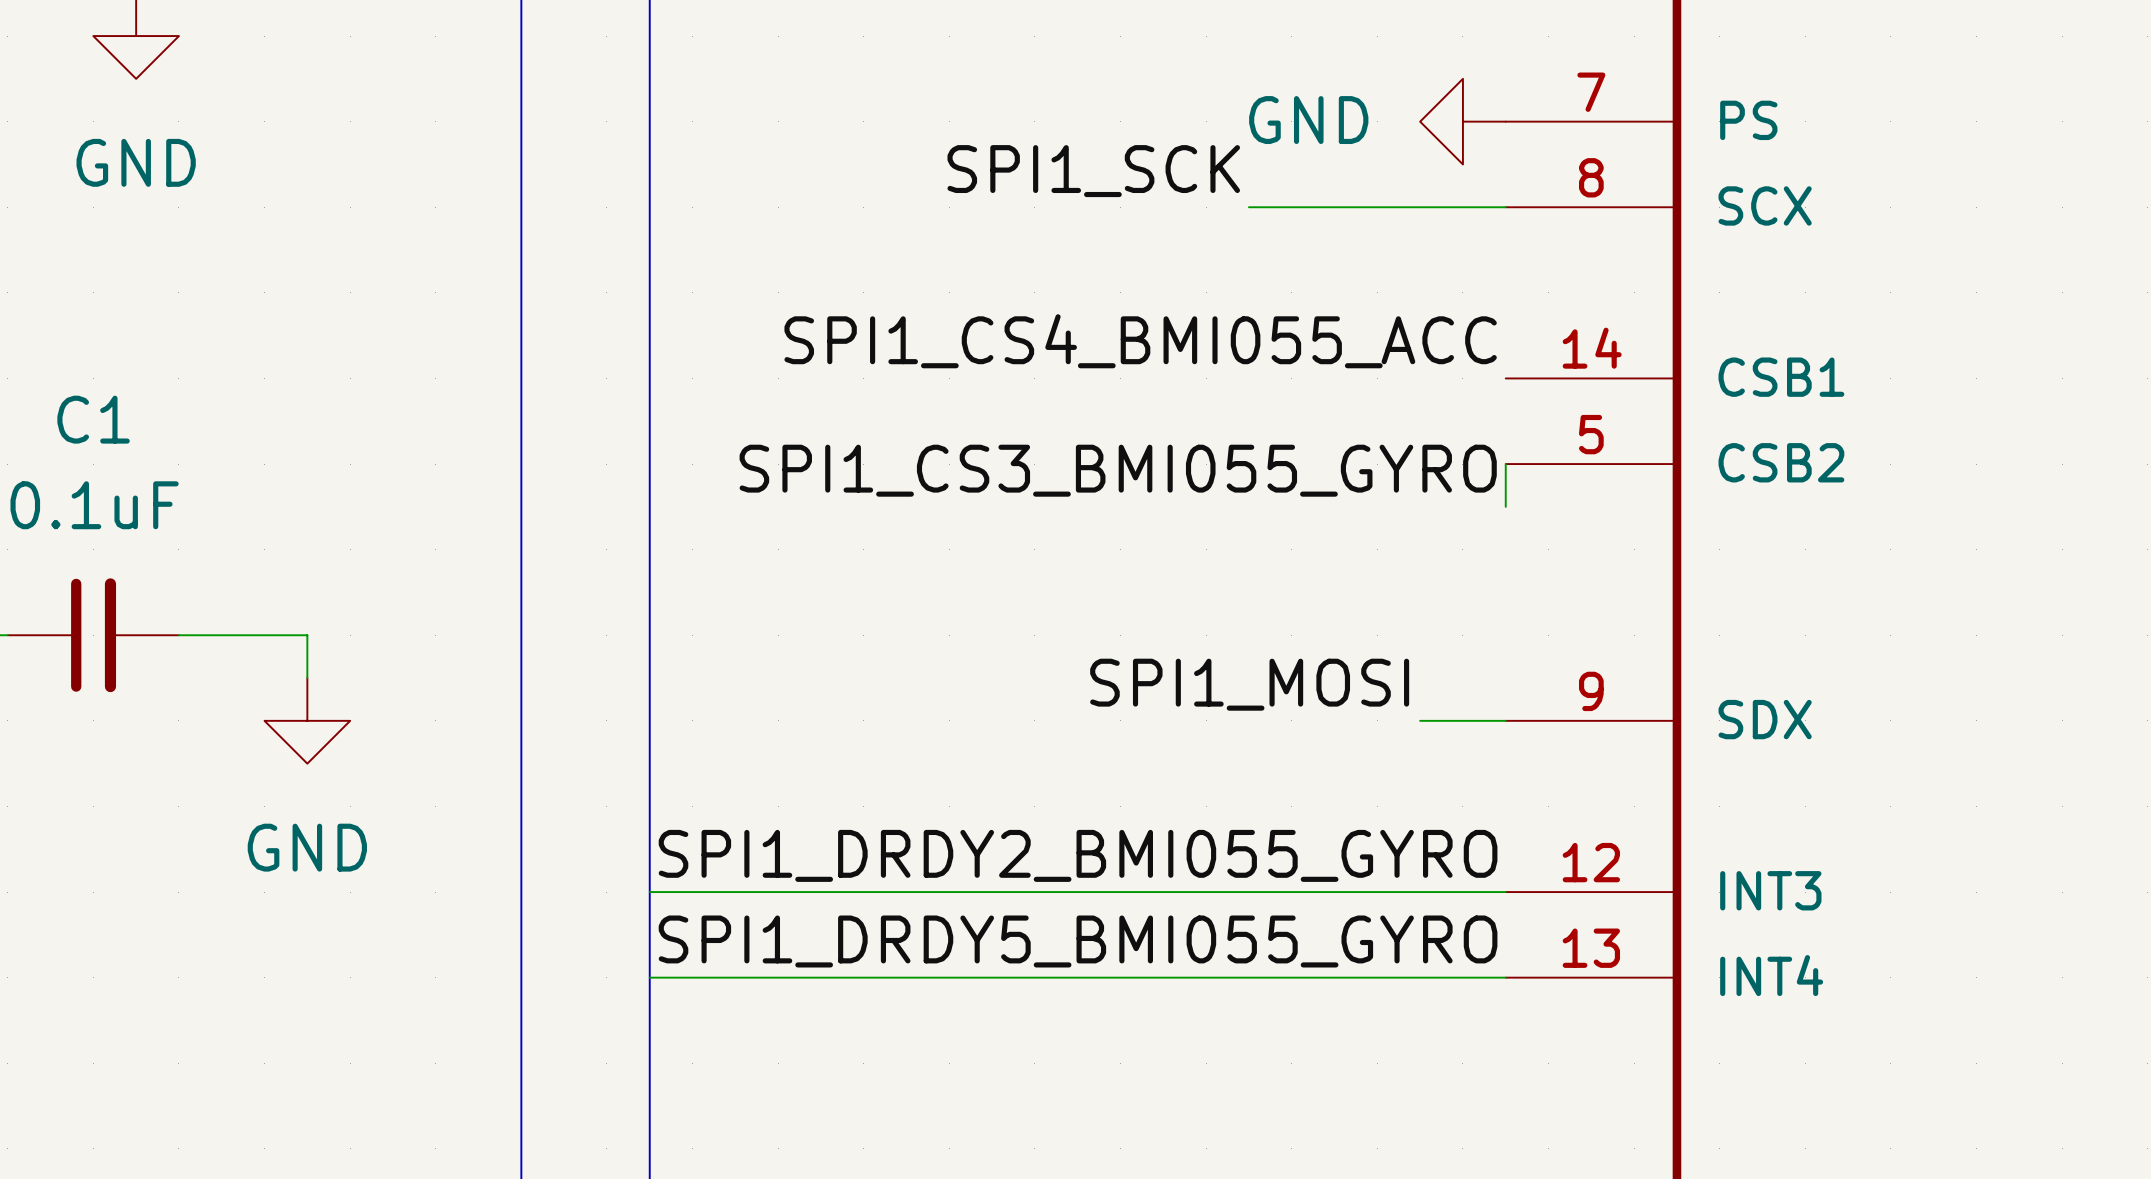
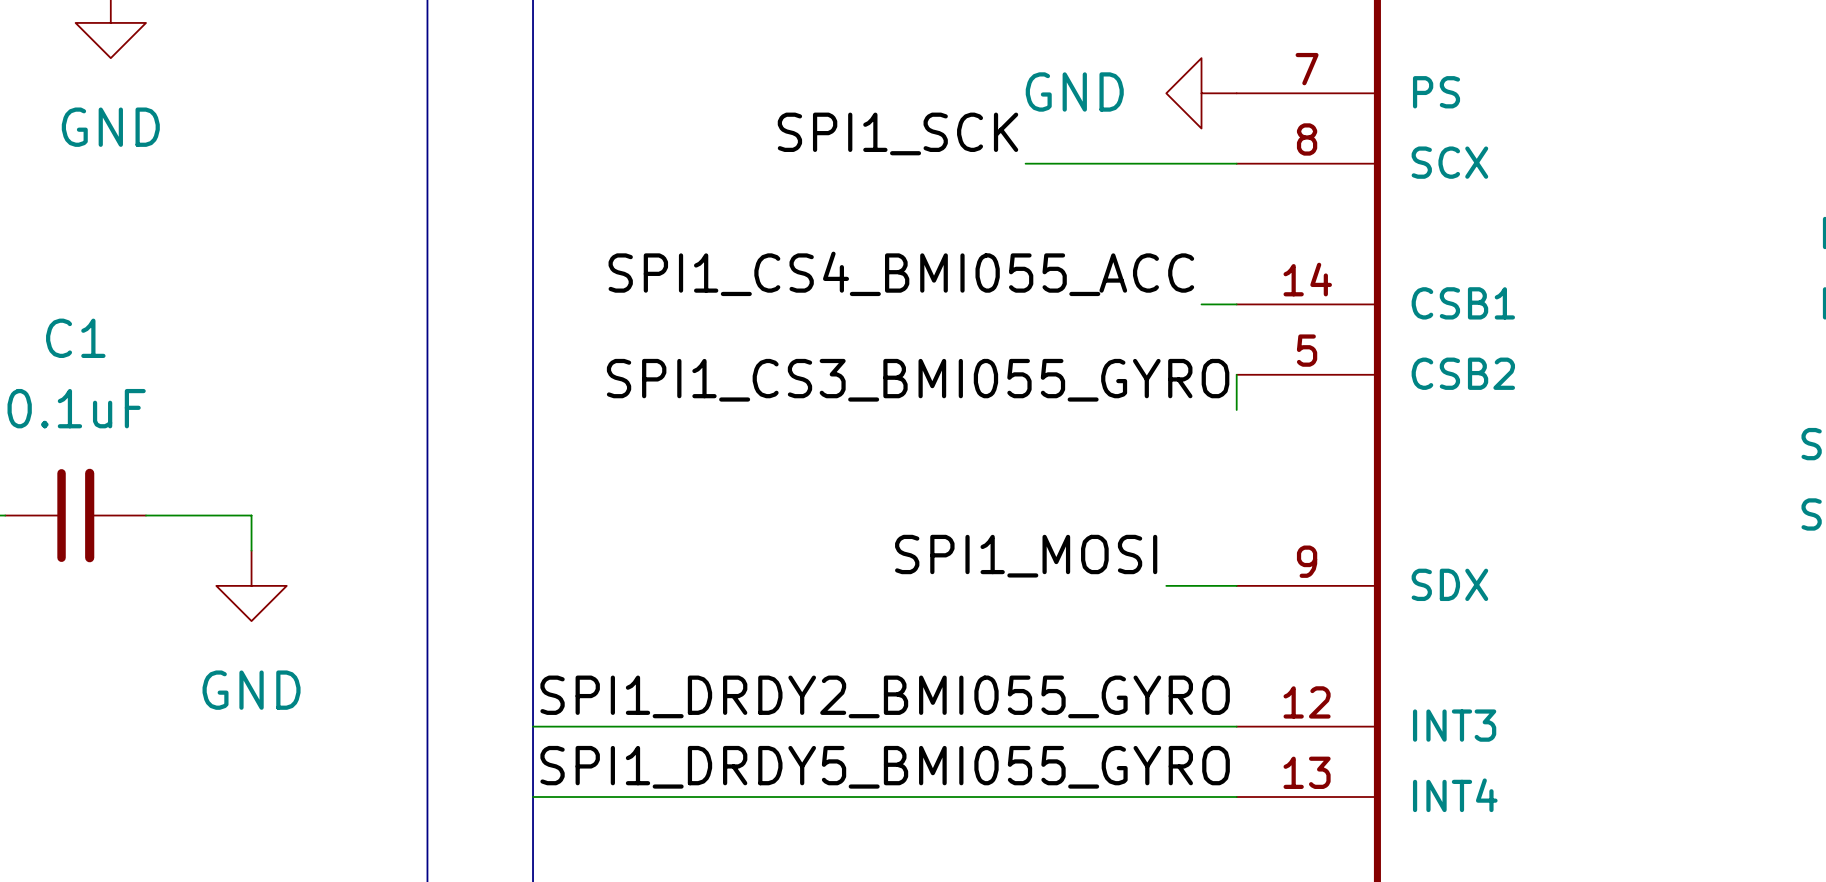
label position: SPI1_CS4_BMI055_ACC (1140, 341) -> SPI1_CS4_BMI055_ACC (901, 273)
wire: none -> (1201, 304) (1236, 304)

